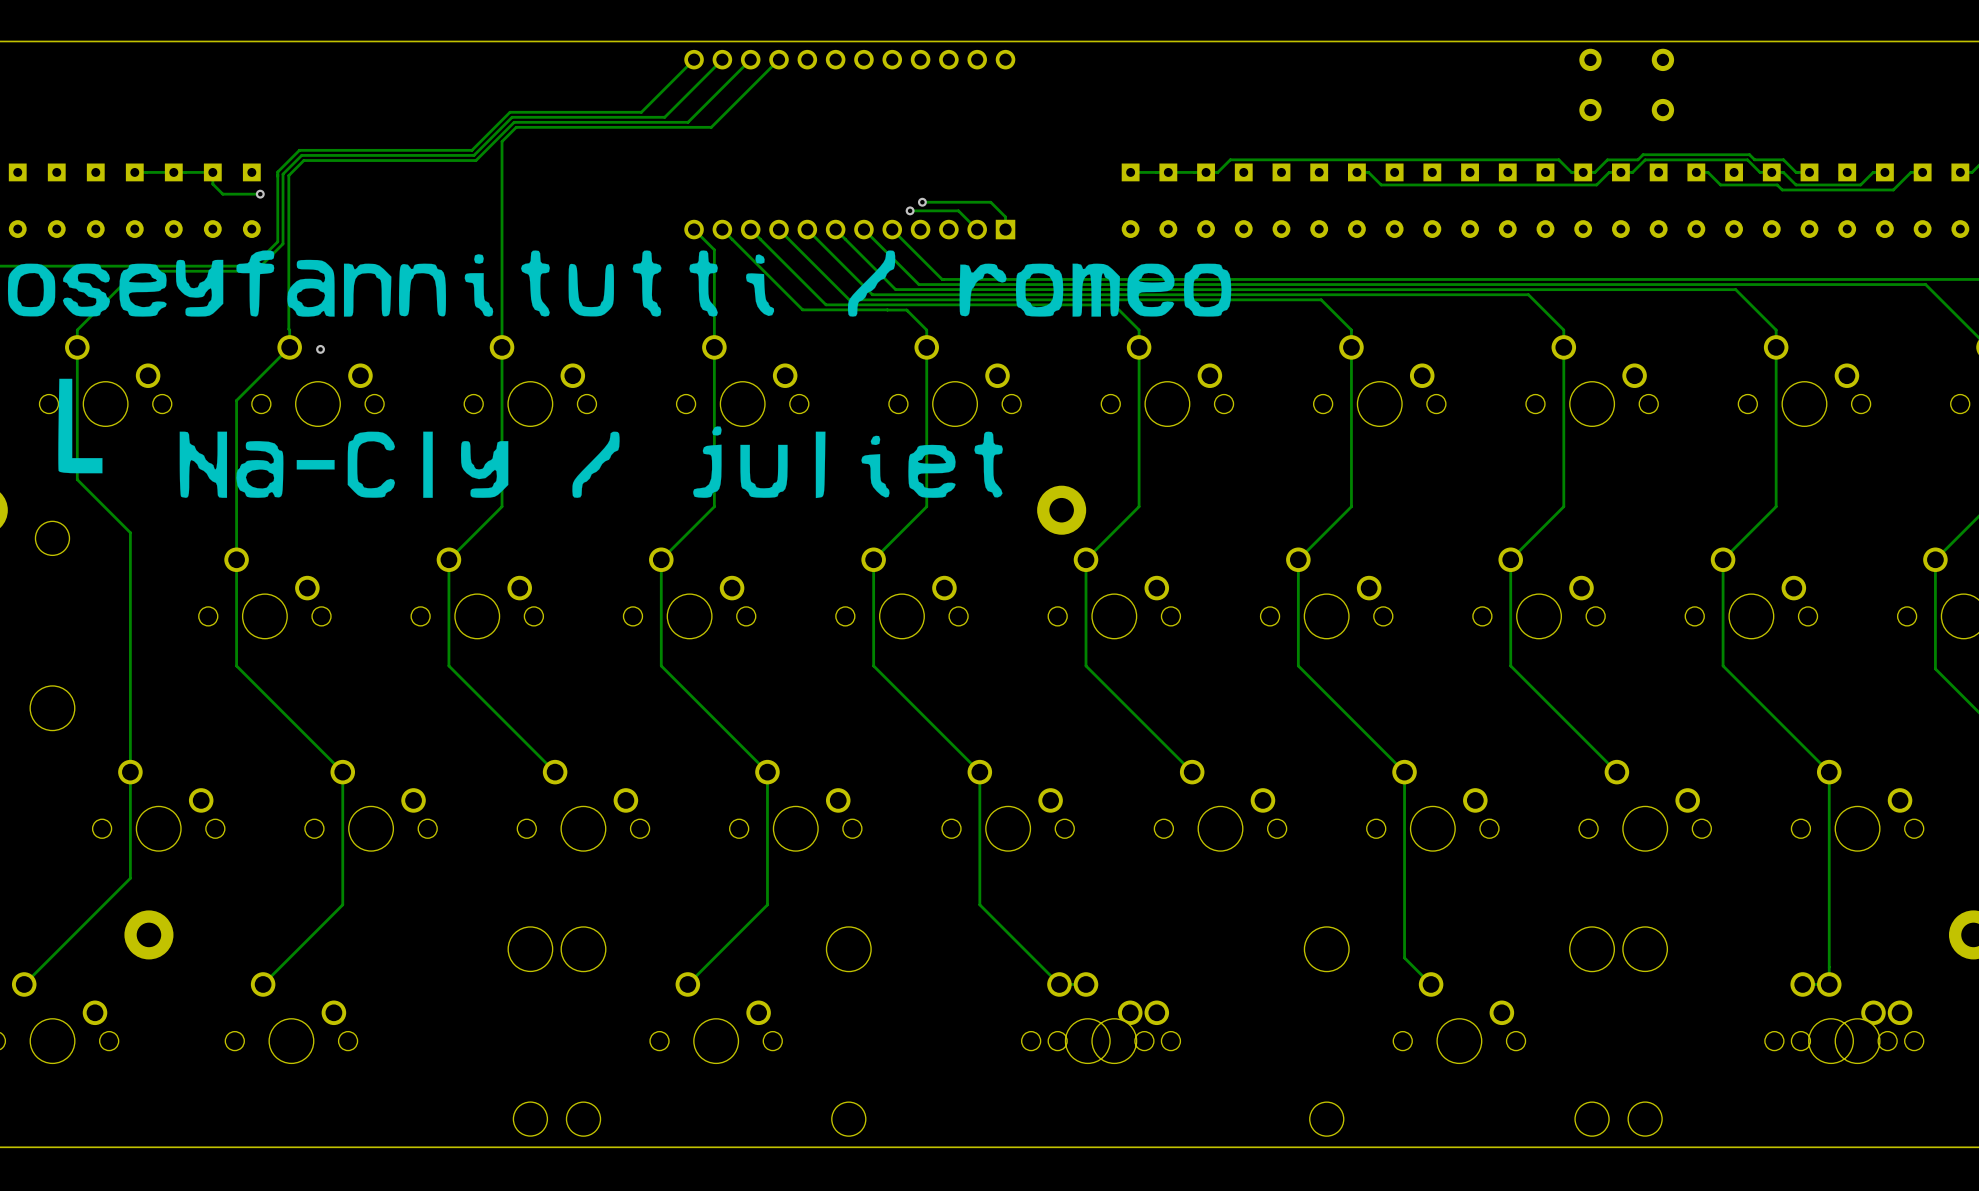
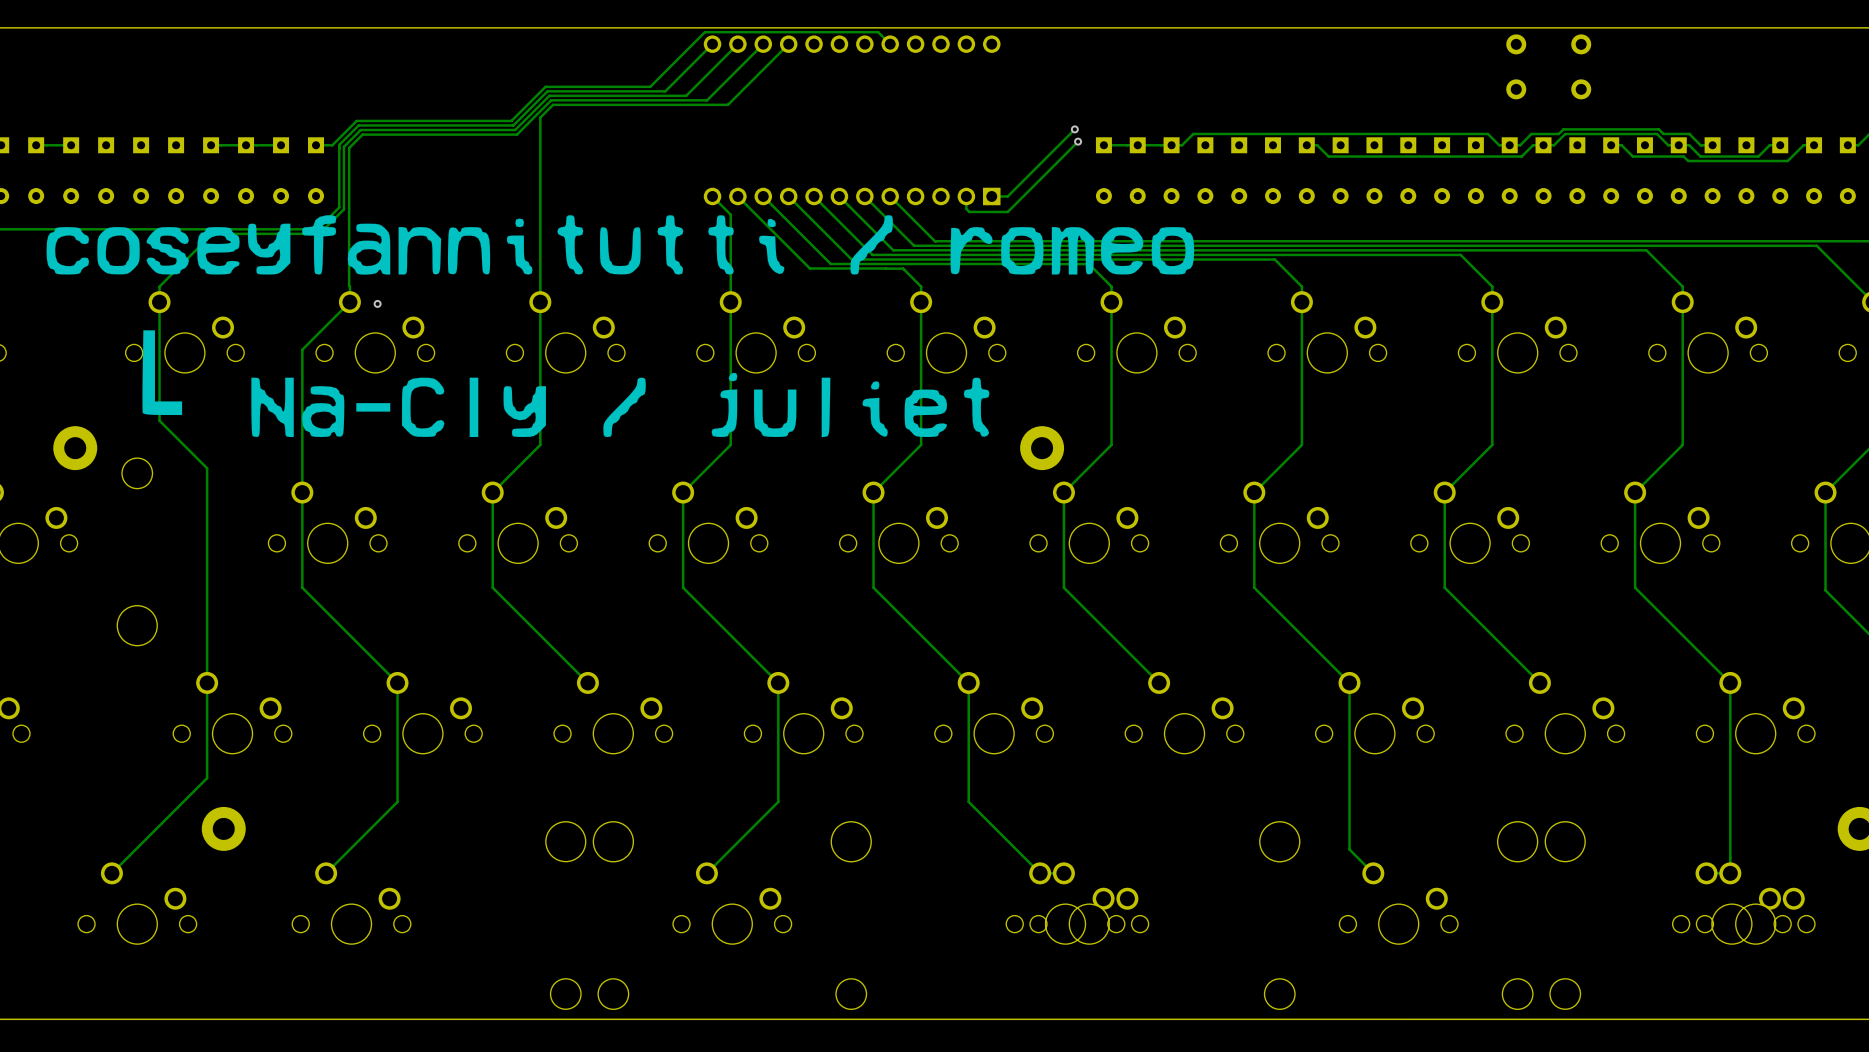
track: none -> (890, 44) (878, 32) (704, 32) (650, 86) (545, 86) (511, 120) (356, 120) (332, 145) (316, 145)
via: none -> (1074, 129)
via: none -> (1078, 141)
track: (212, 172) (212, 184) (222, 194) (260, 194) -> none
via: (260, 194) -> none
track: (922, 202) (990, 202) (1005, 217) (1005, 229) -> (1074, 129) (1007, 196) (991, 196)
via: (922, 202) -> none
track: (910, 210) (958, 210) (977, 229) -> (1078, 141) (1007, 211) (969, 211) (966, 208) (966, 196)
via: (910, 210) -> none

